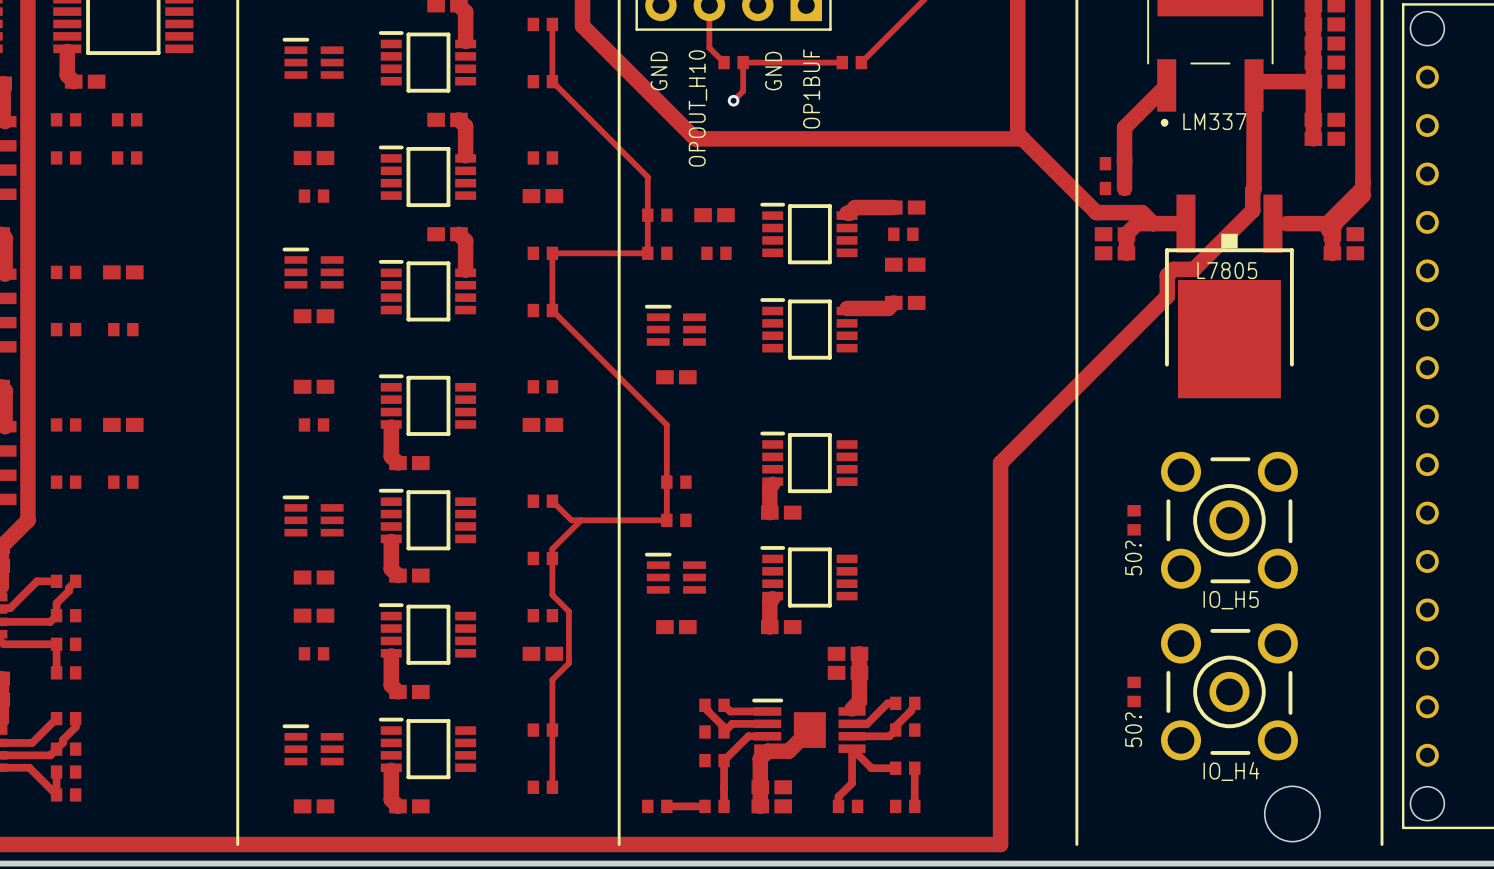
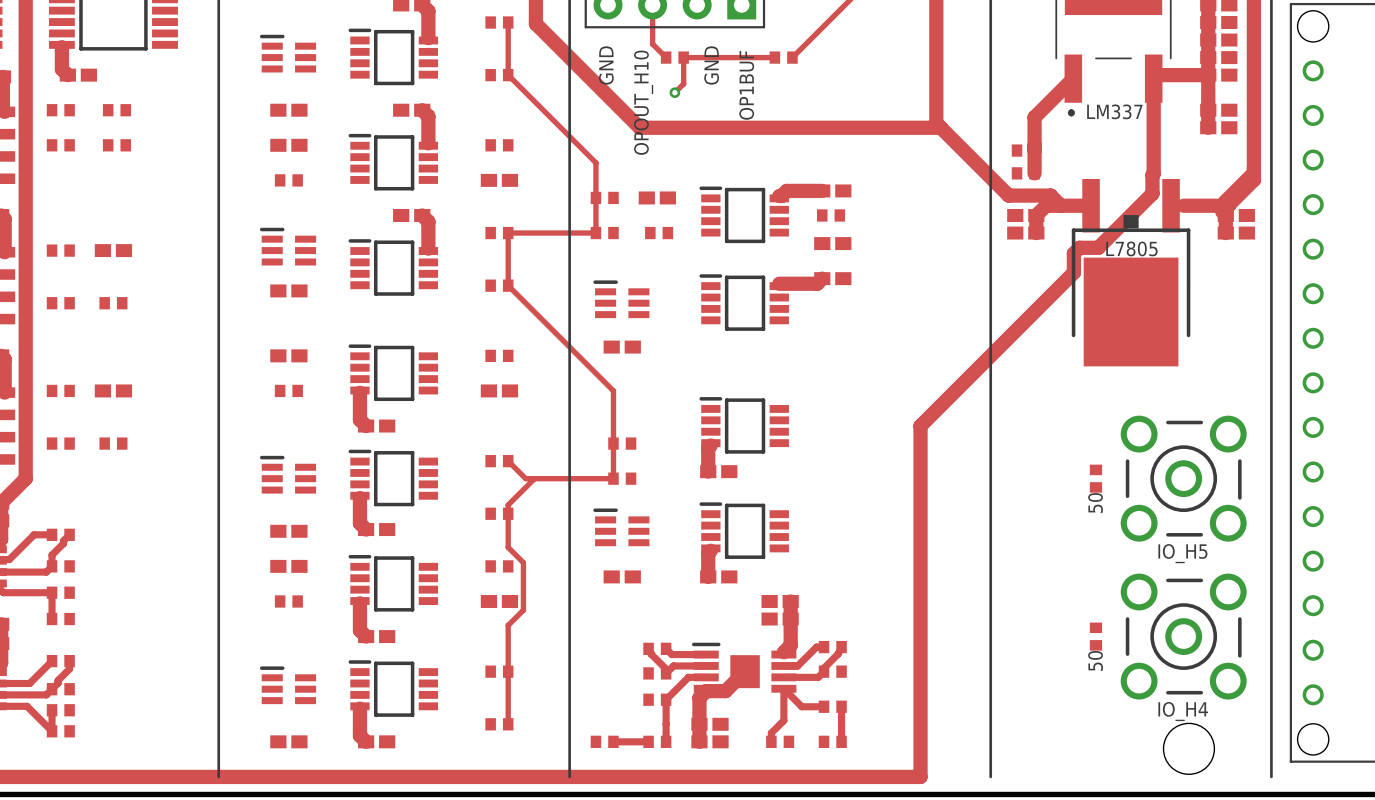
part: 50? (1134, 520) -> none
part: none -> 50 (1095, 478)
IO_H5 position: (1229, 520) -> (1183, 478)
part: 50? (1134, 691) -> none
part: none -> 50 (1095, 636)
IO_H4 position: (1229, 691) -> (1183, 636)

